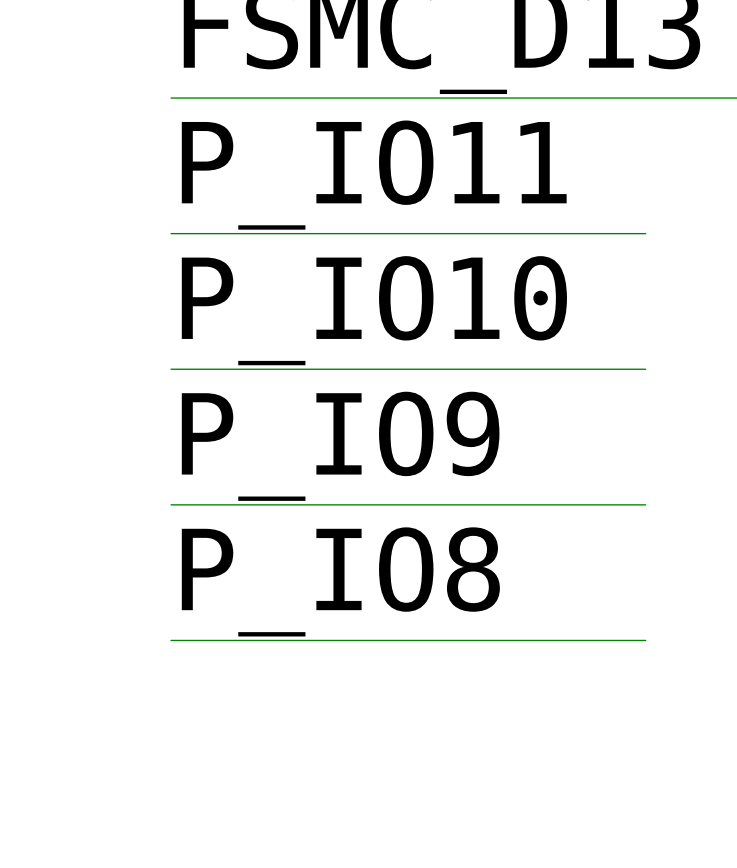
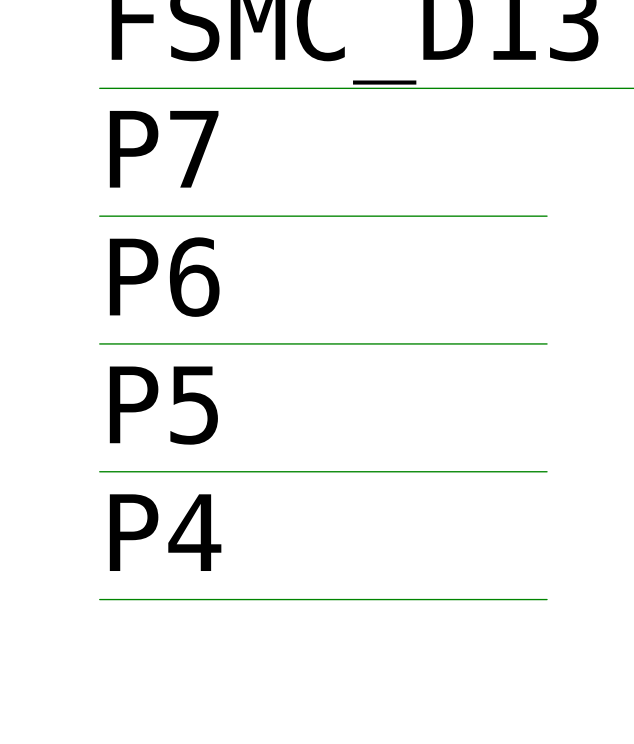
label: P_IO11 (374, 175) -> P7 (164, 149)
label: P_IO10 (374, 310) -> P6 (164, 277)
label: P_IO9 (340, 446) -> P5 (163, 405)
label: P_IO8 (340, 581) -> P4 (165, 532)

